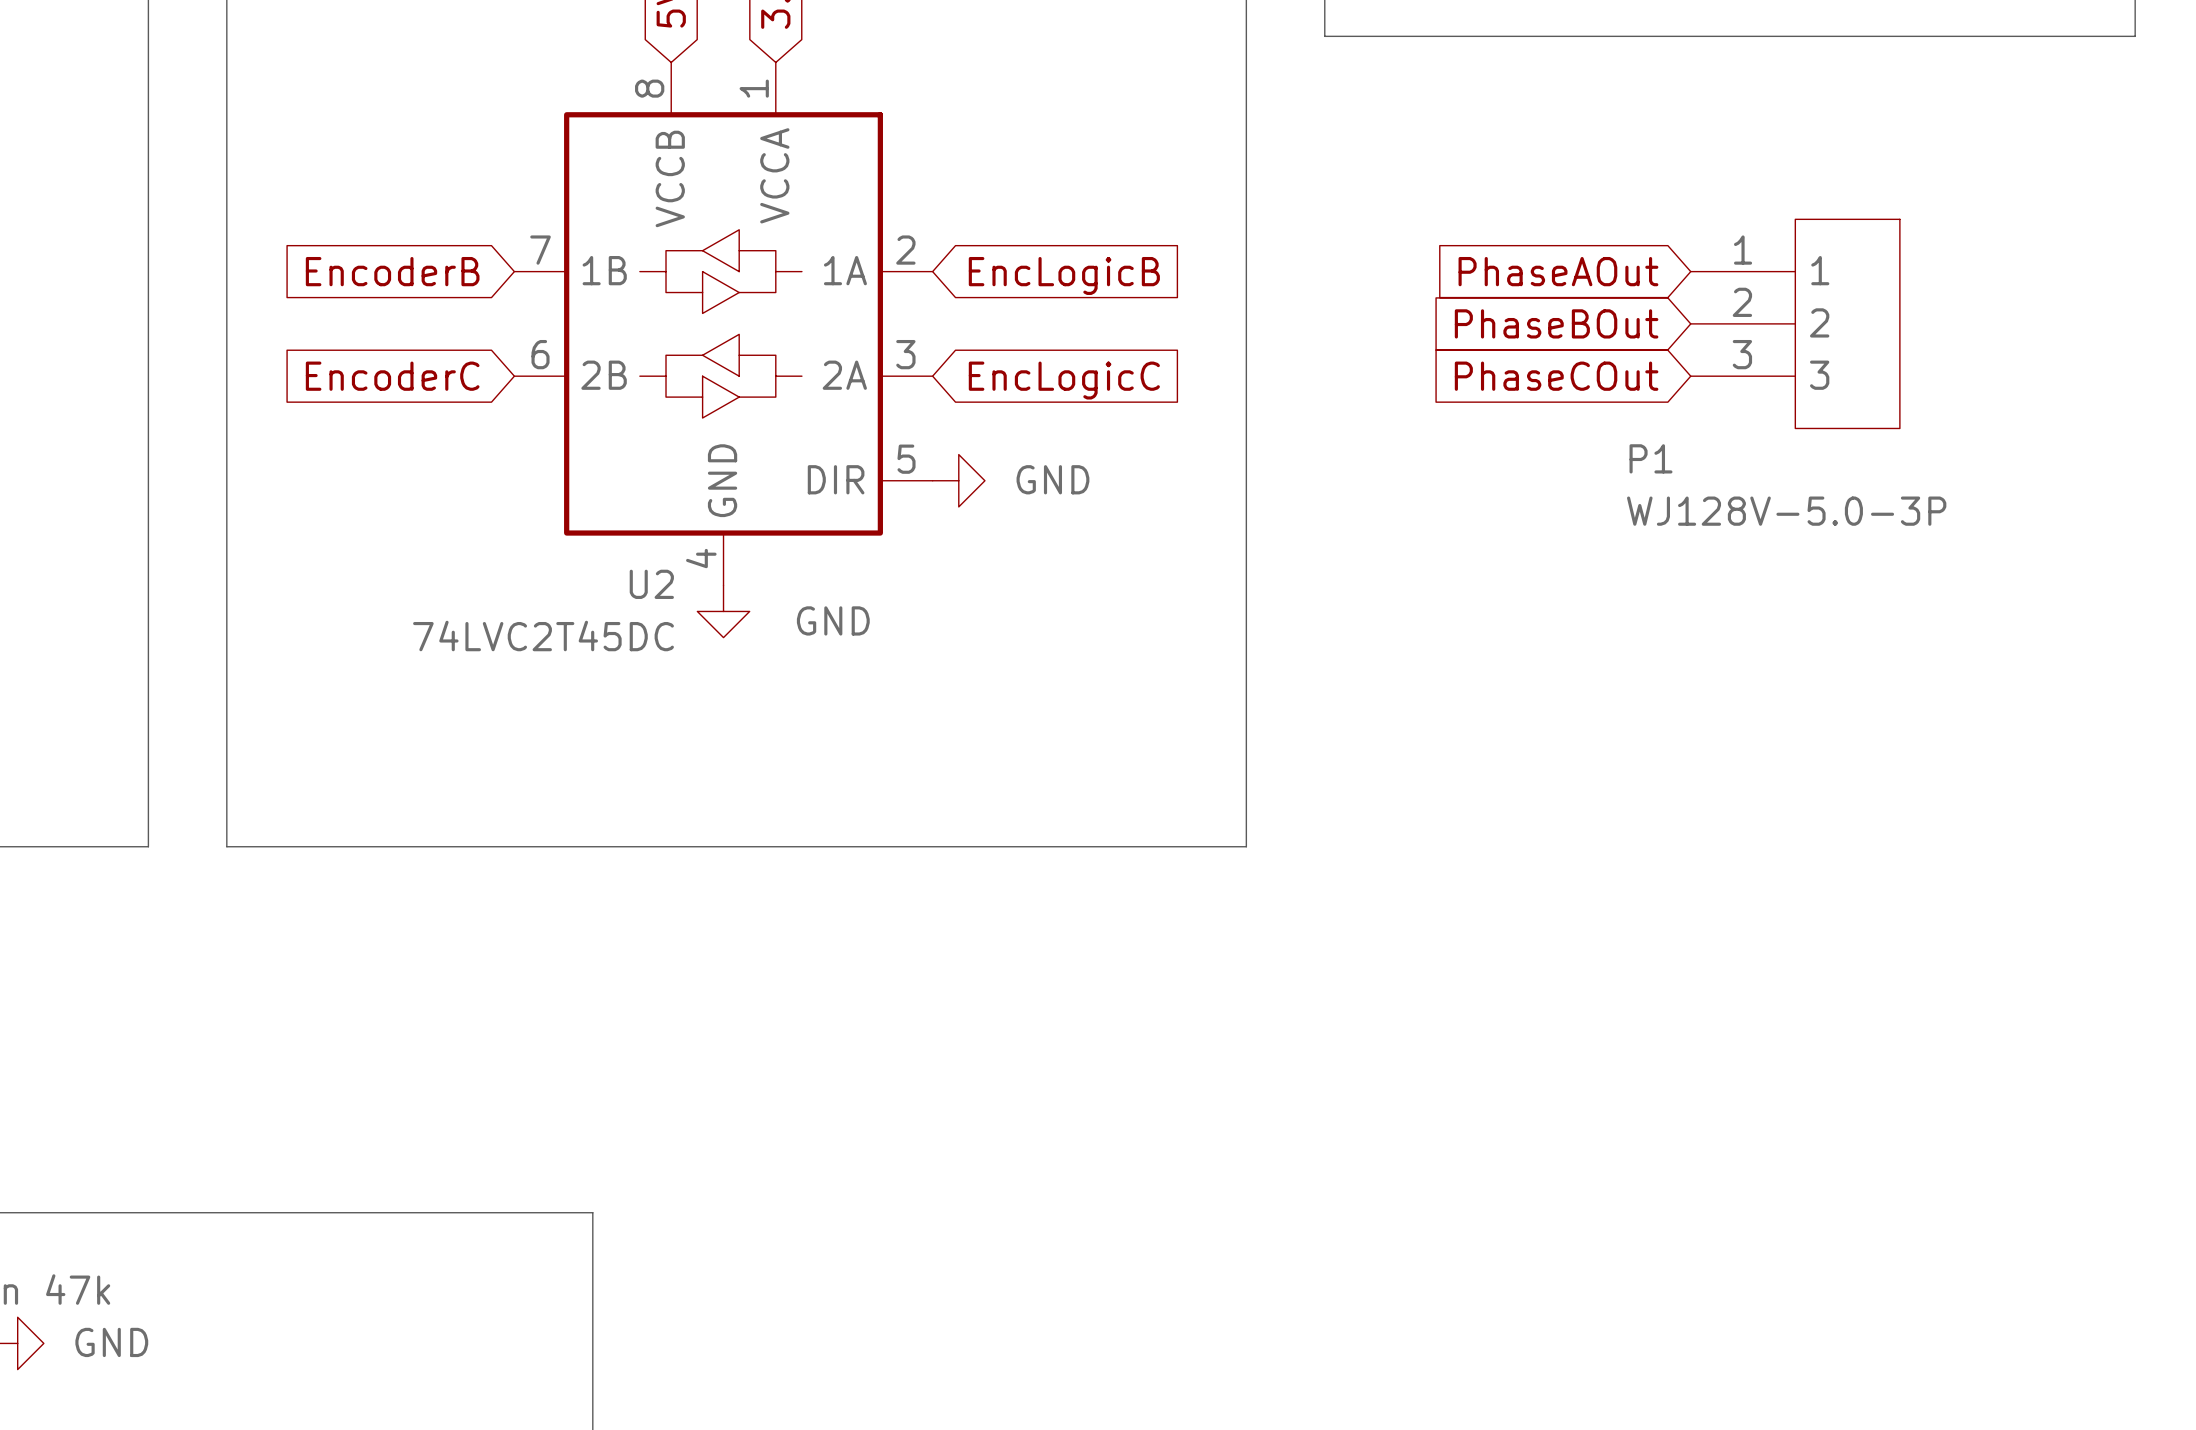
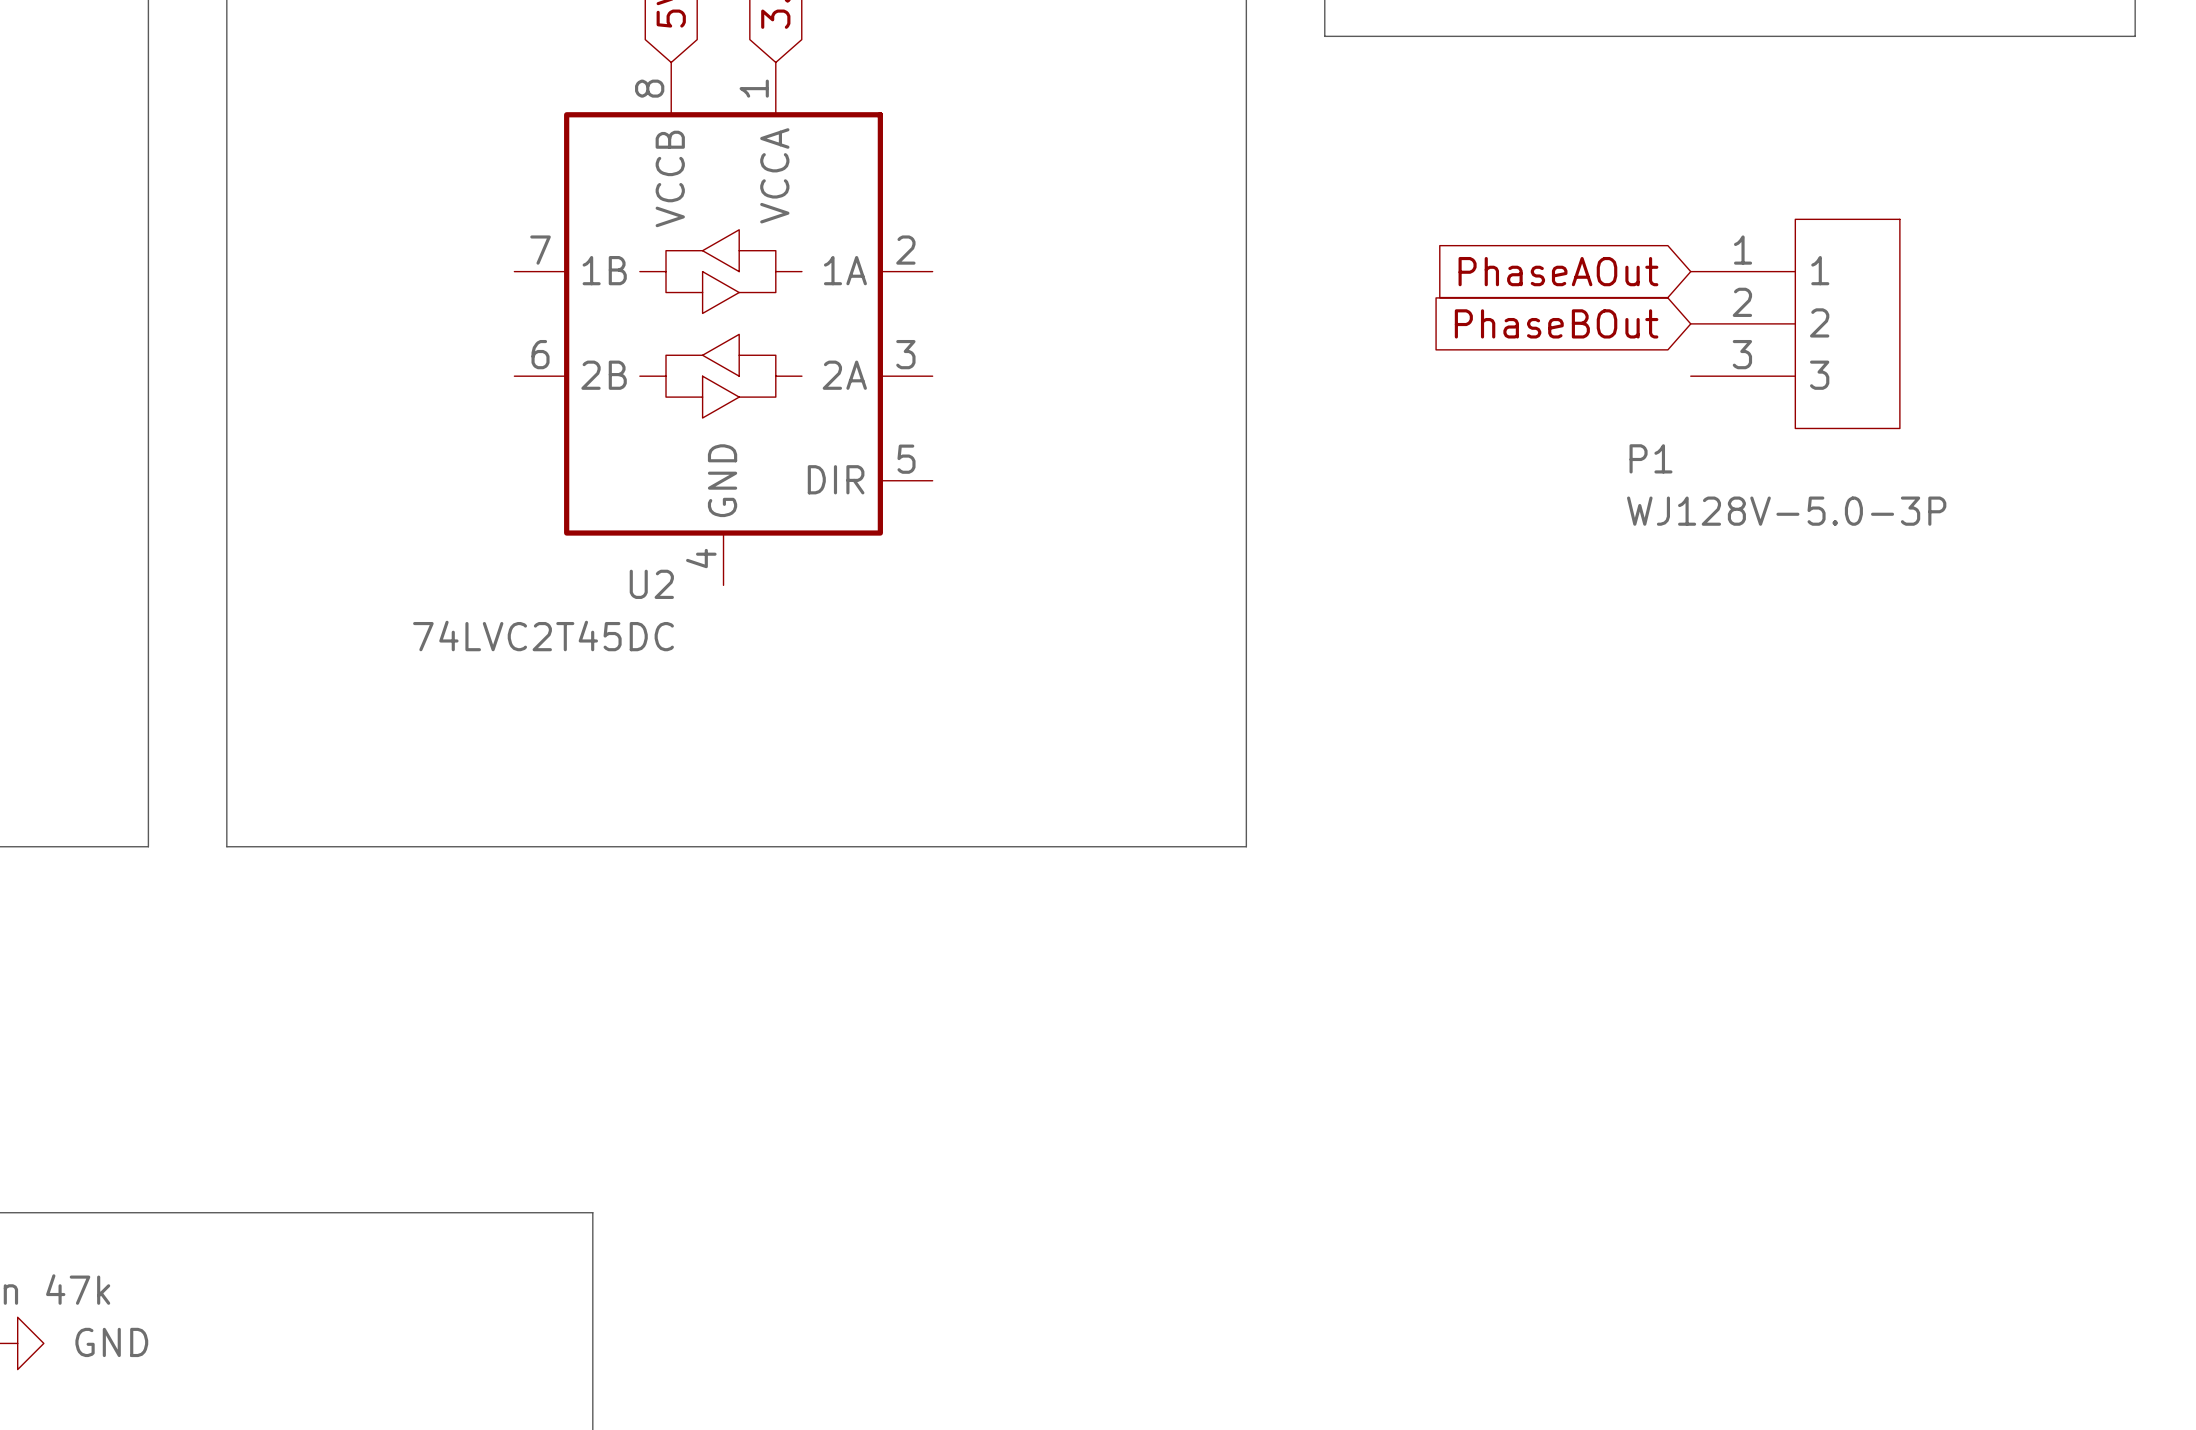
global label: EncoderB (392, 271) -> none
global label: EncLogicB (1064, 275) -> none
global label: EncoderC (392, 376) -> none
global label: PhaseCOut (1556, 376) -> none
global label: EncLogicC (1064, 380) -> none
power symbol: GND (958, 480) -> none
power symbol: GND (723, 611) -> none

